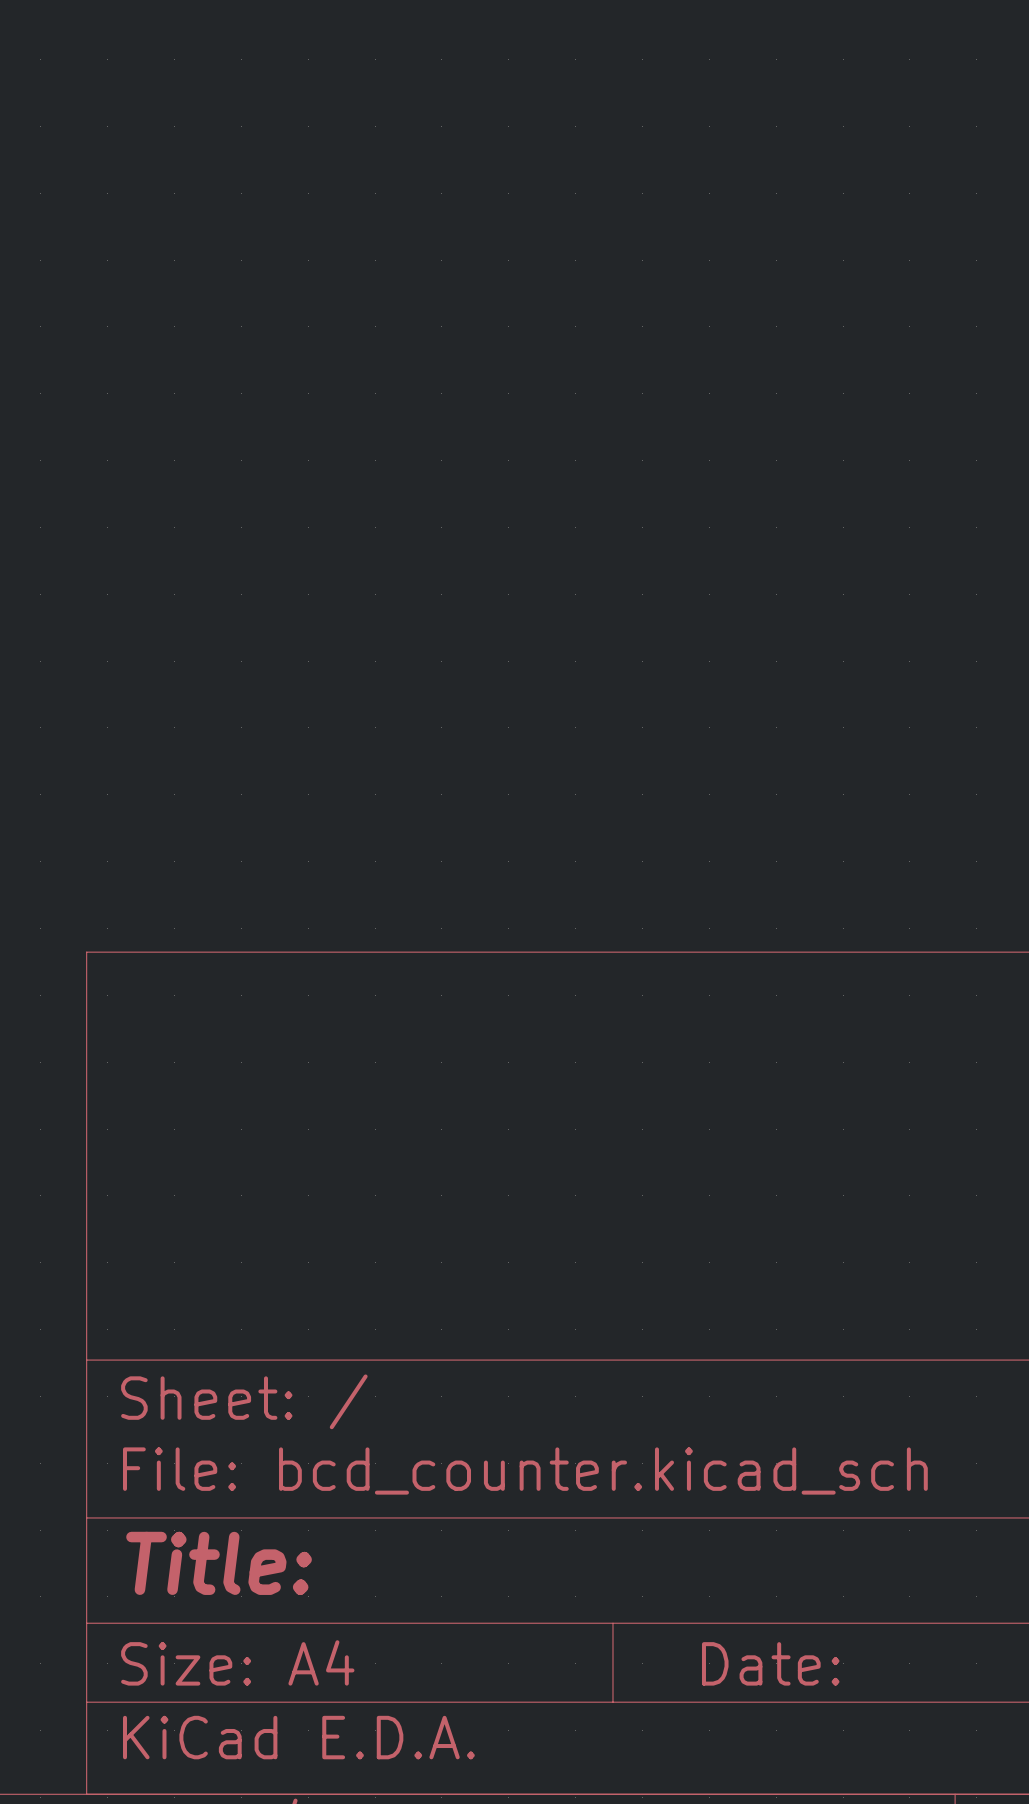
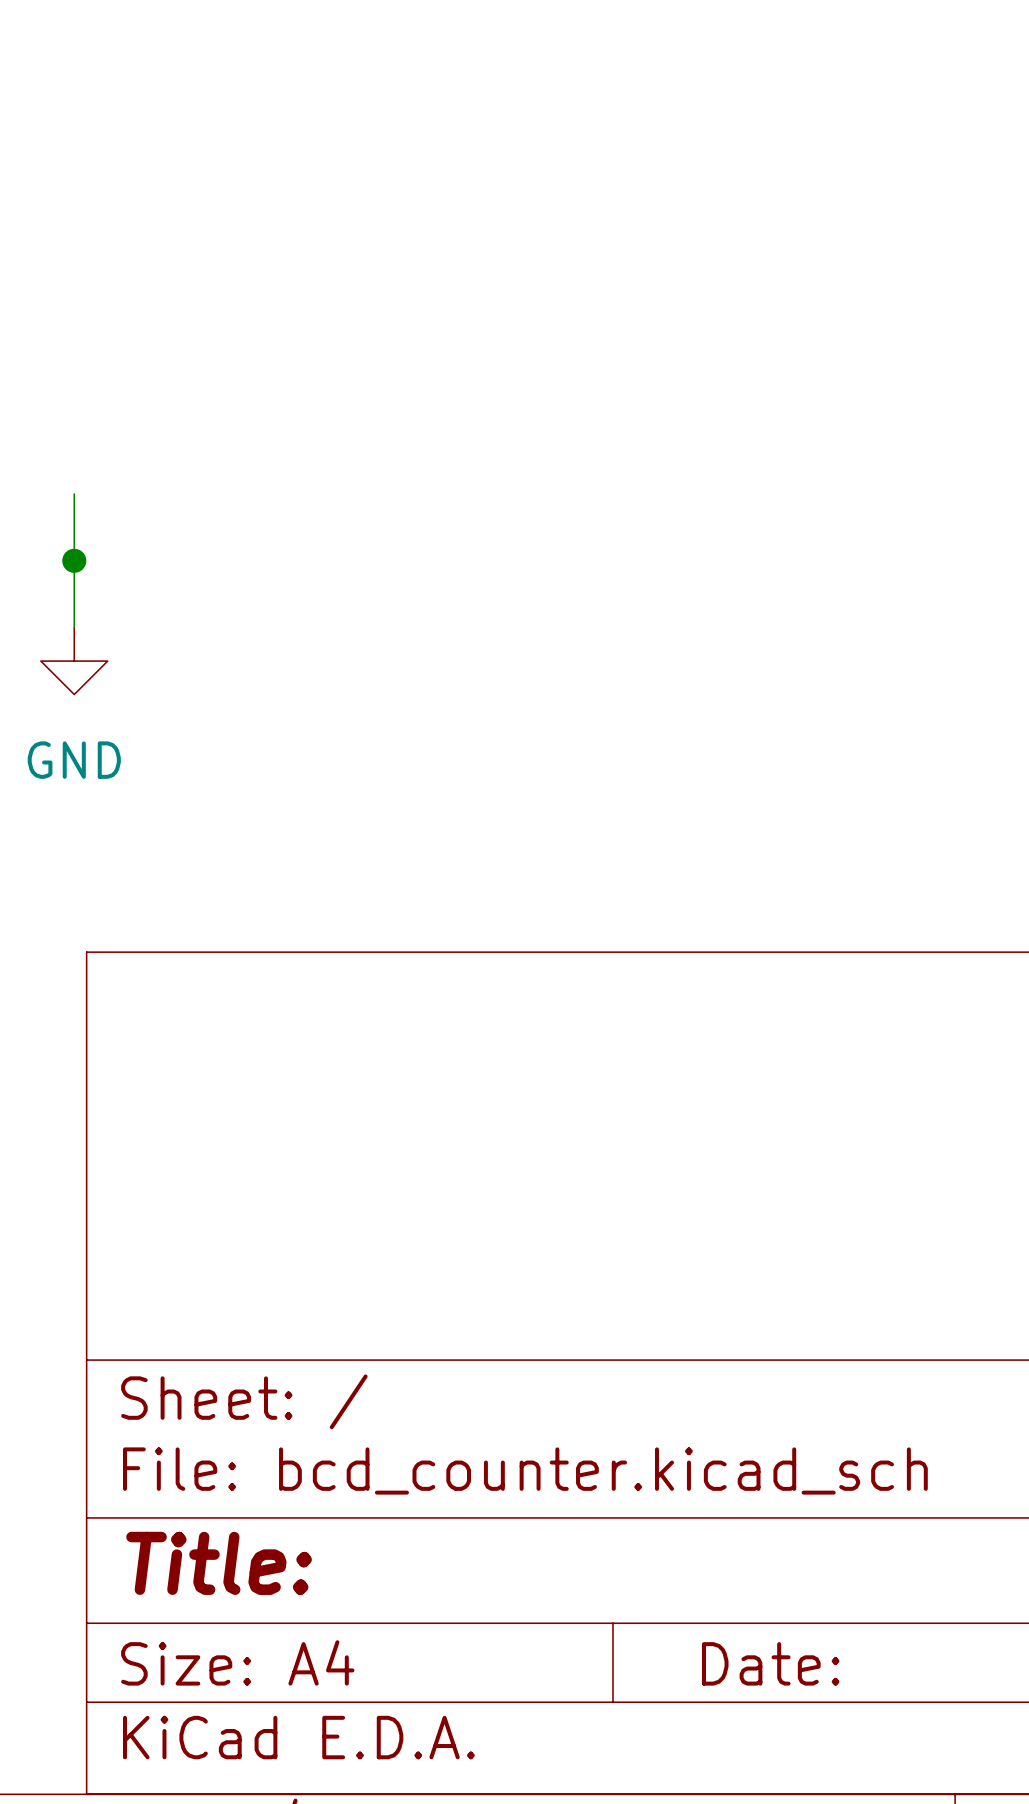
wire: none -> (74, 493) (74, 627)
junction: none -> (74, 560)
power symbol: none -> GND (74, 661)

